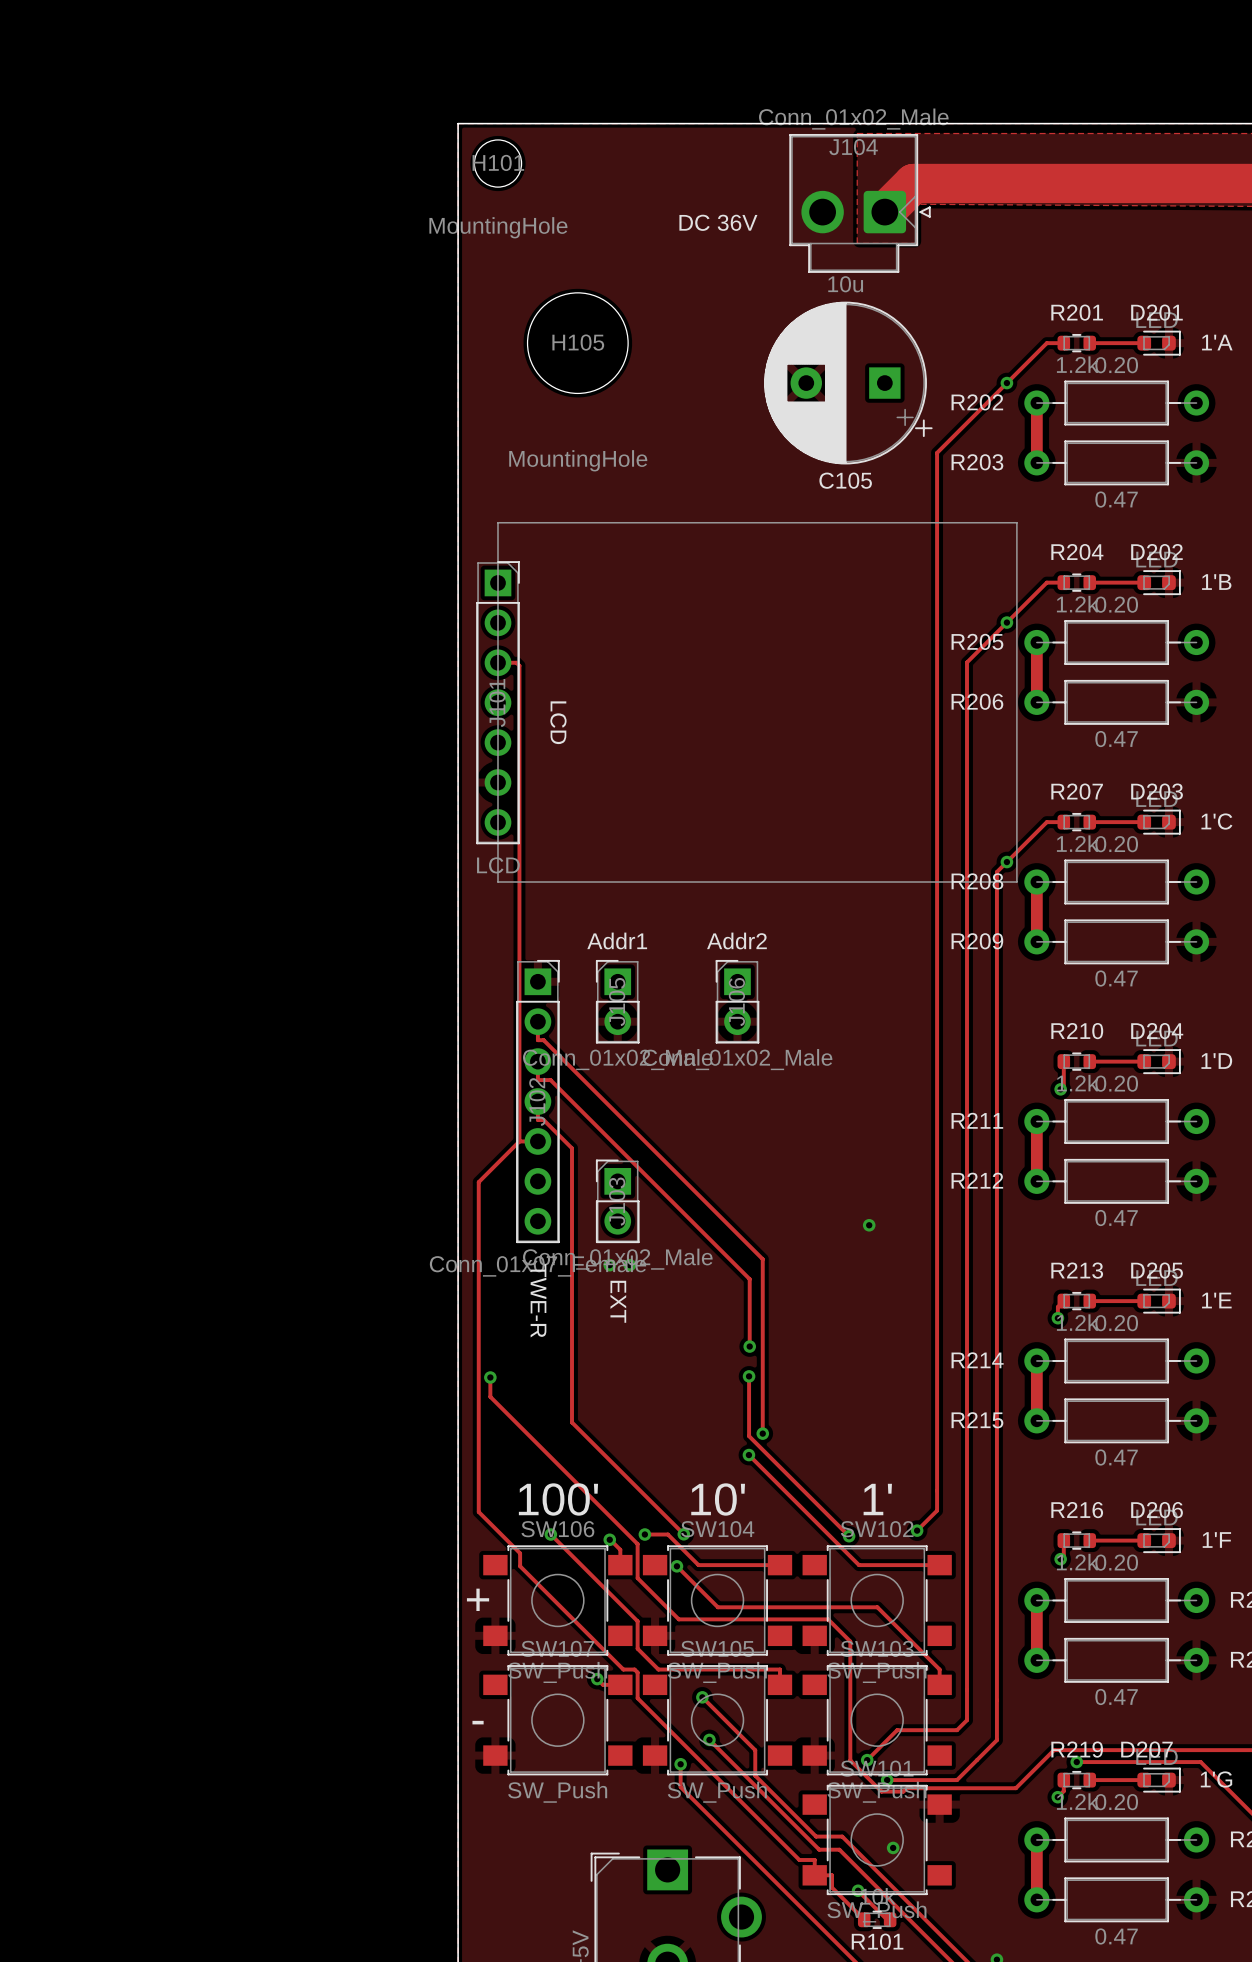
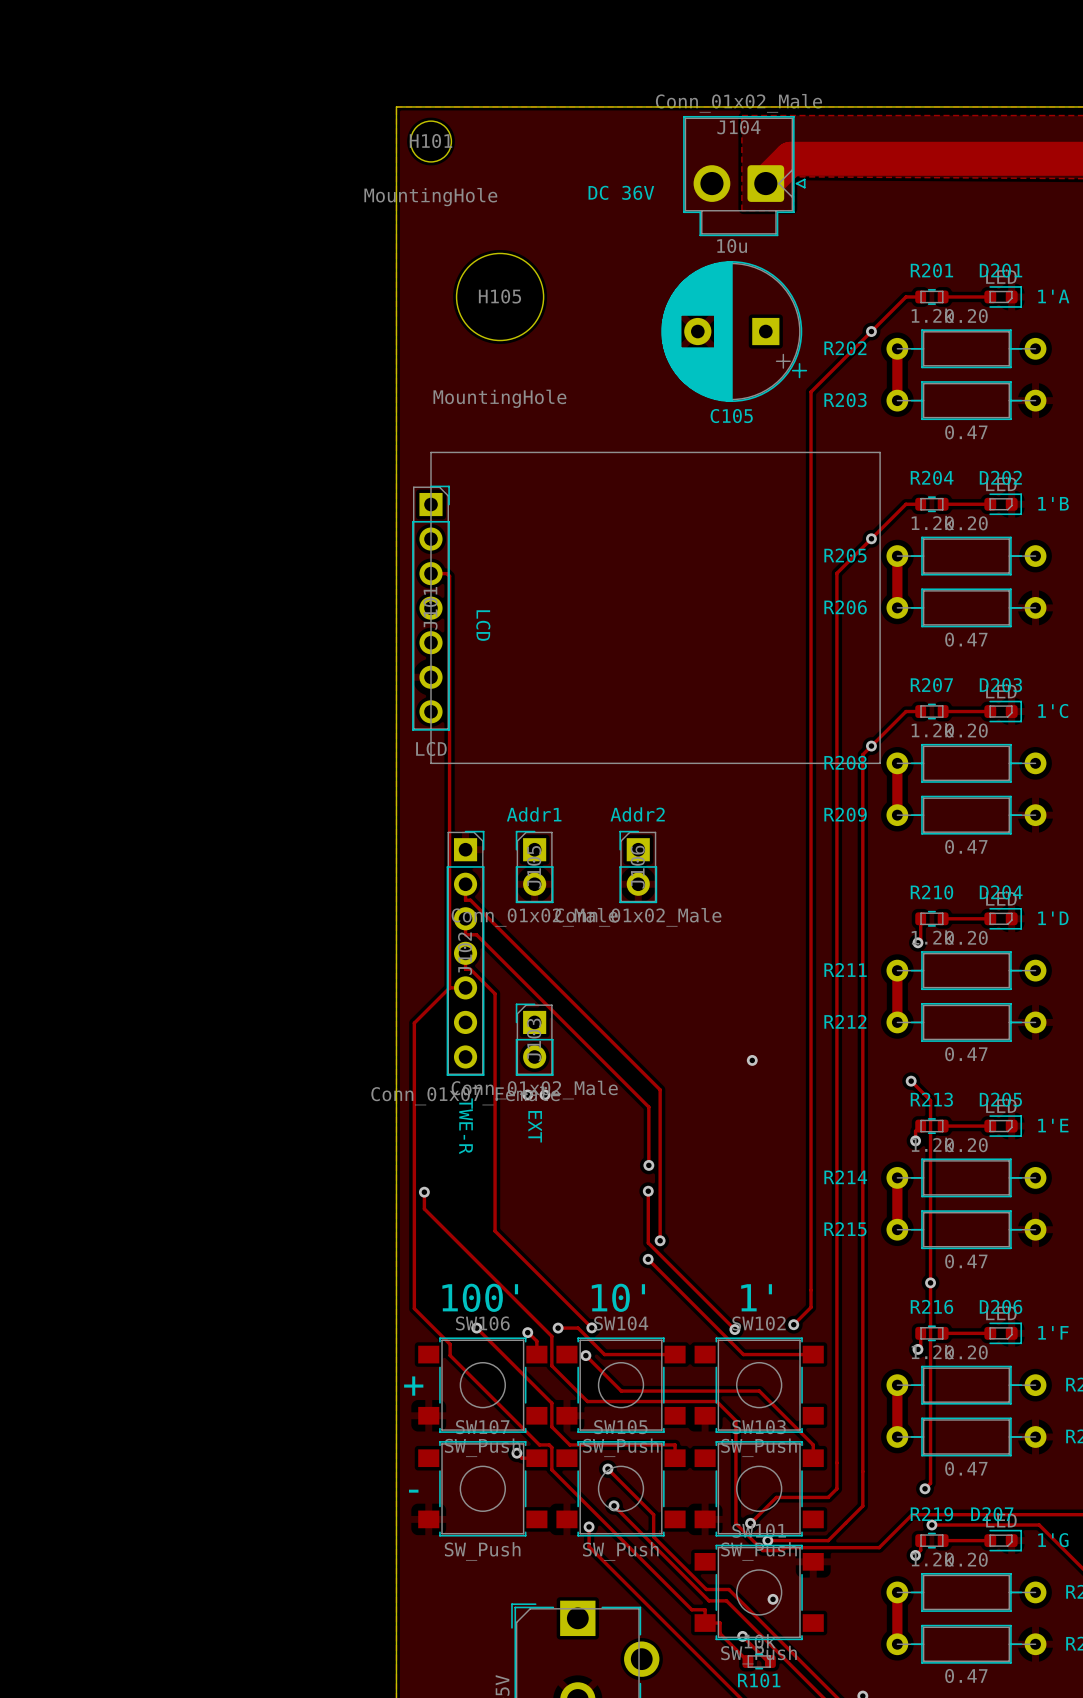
track: none -> (911, 1081) (930, 1100) (930, 1483) (925, 1488)
via: none -> (911, 1081)
via: none -> (930, 1282)
via: none -> (925, 1488)

